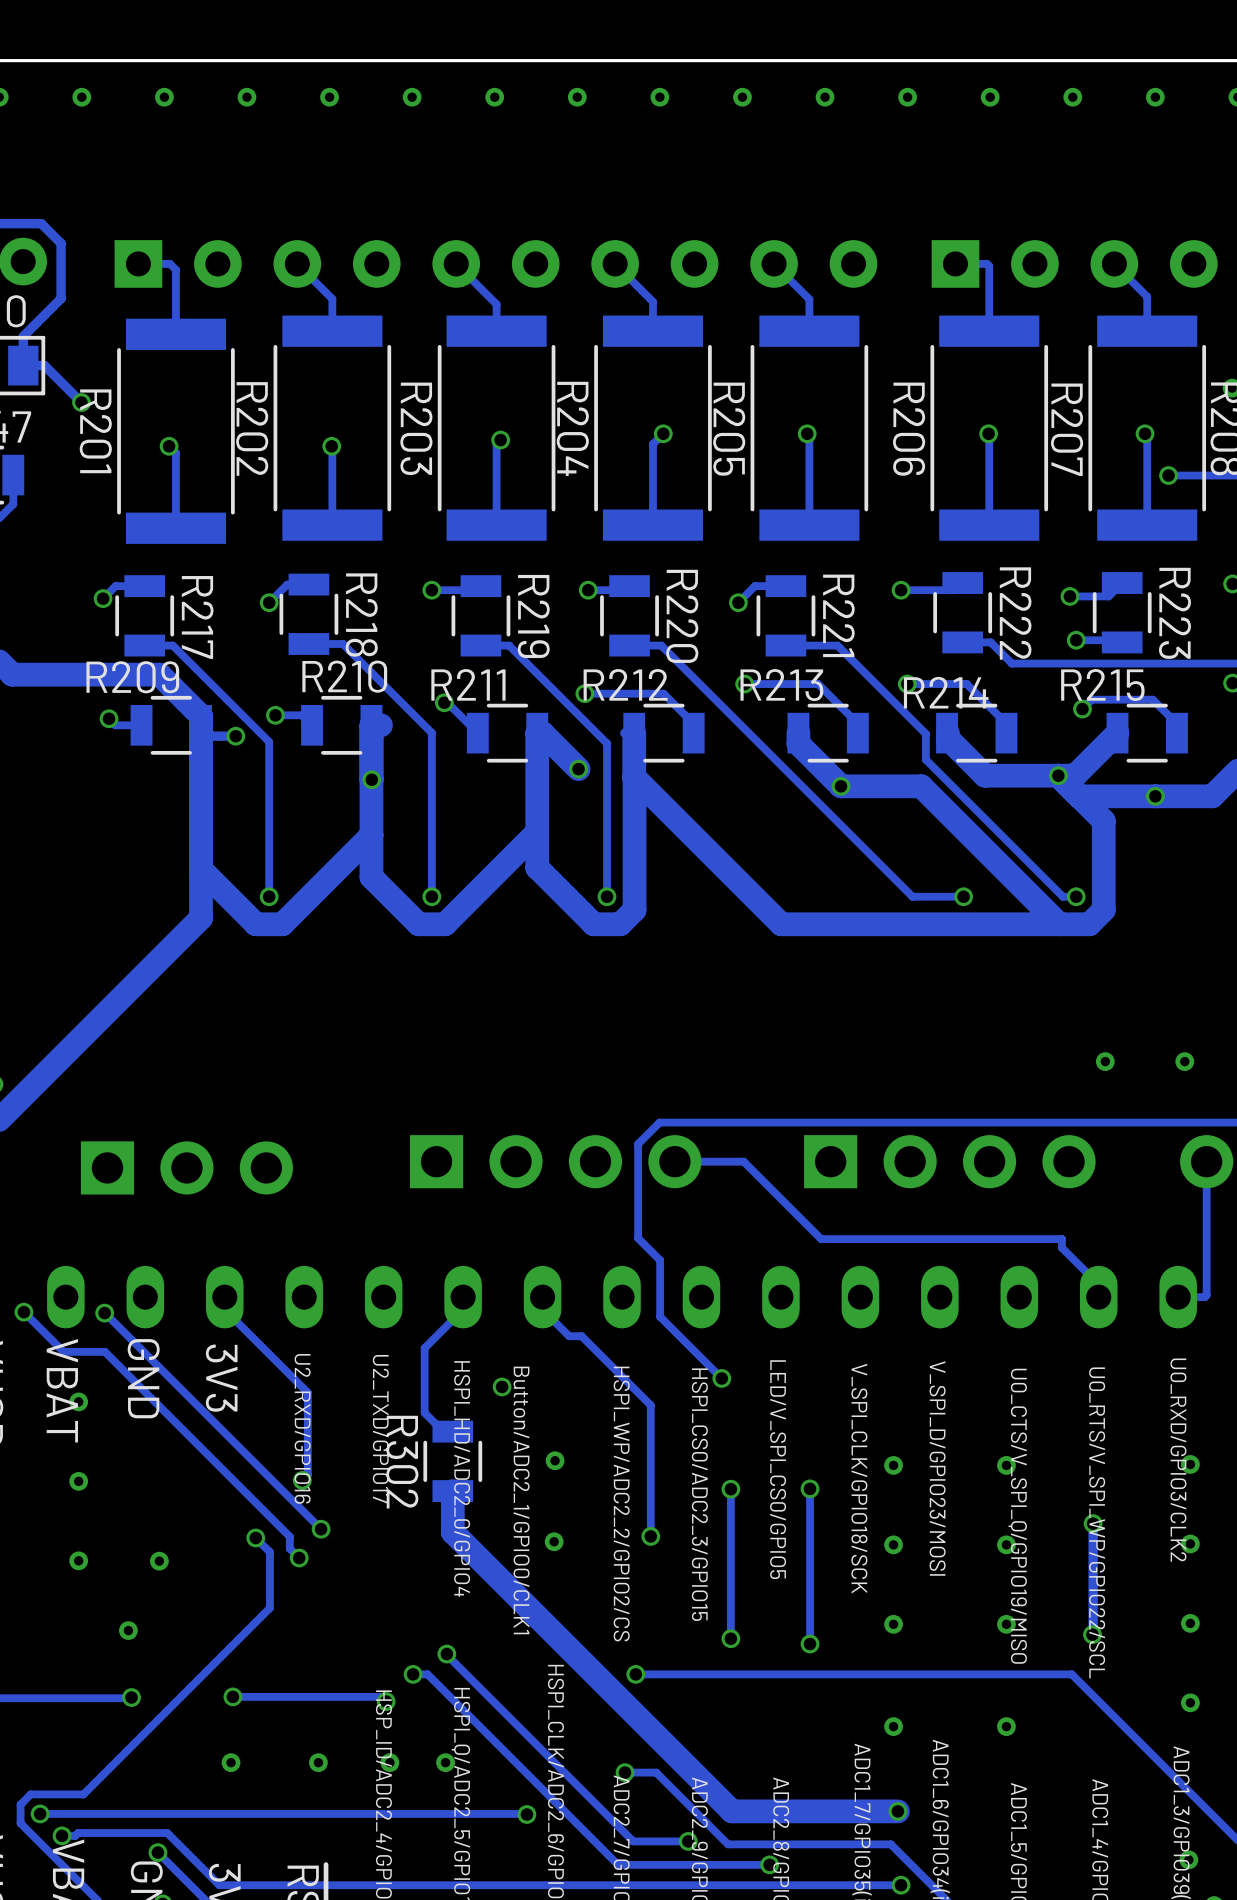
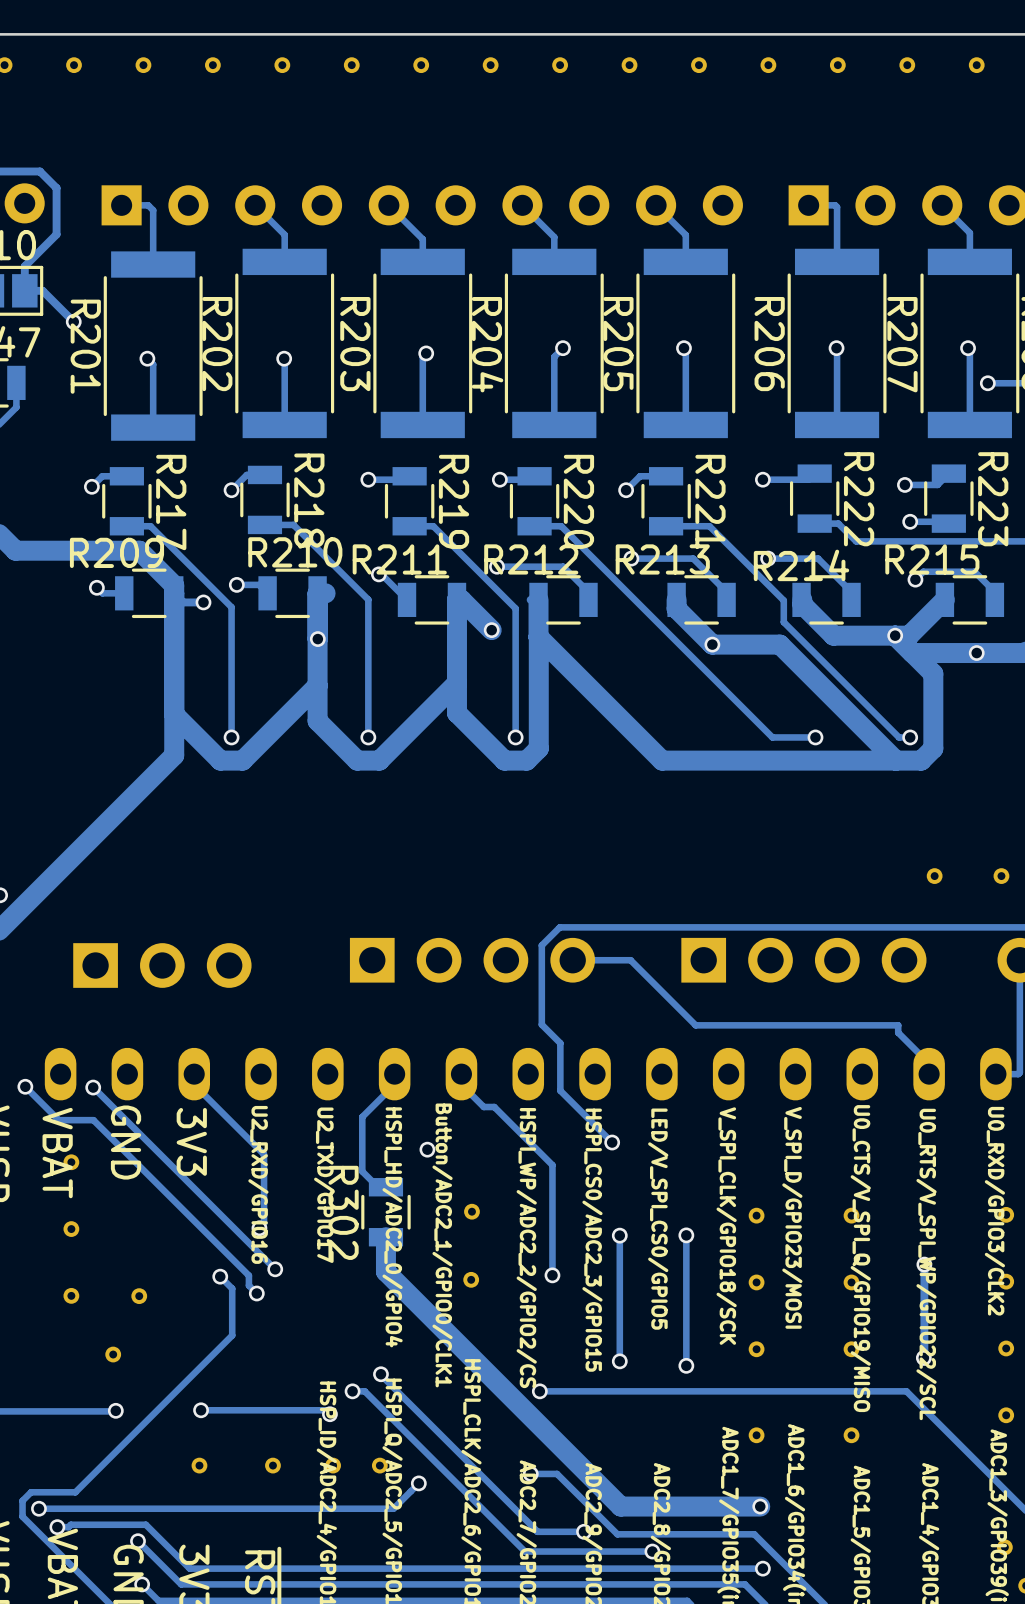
track: (461, 1813) (526, 1814) -> (393, 1508) (418, 1483)
via position: (526, 1814) -> (418, 1483)

